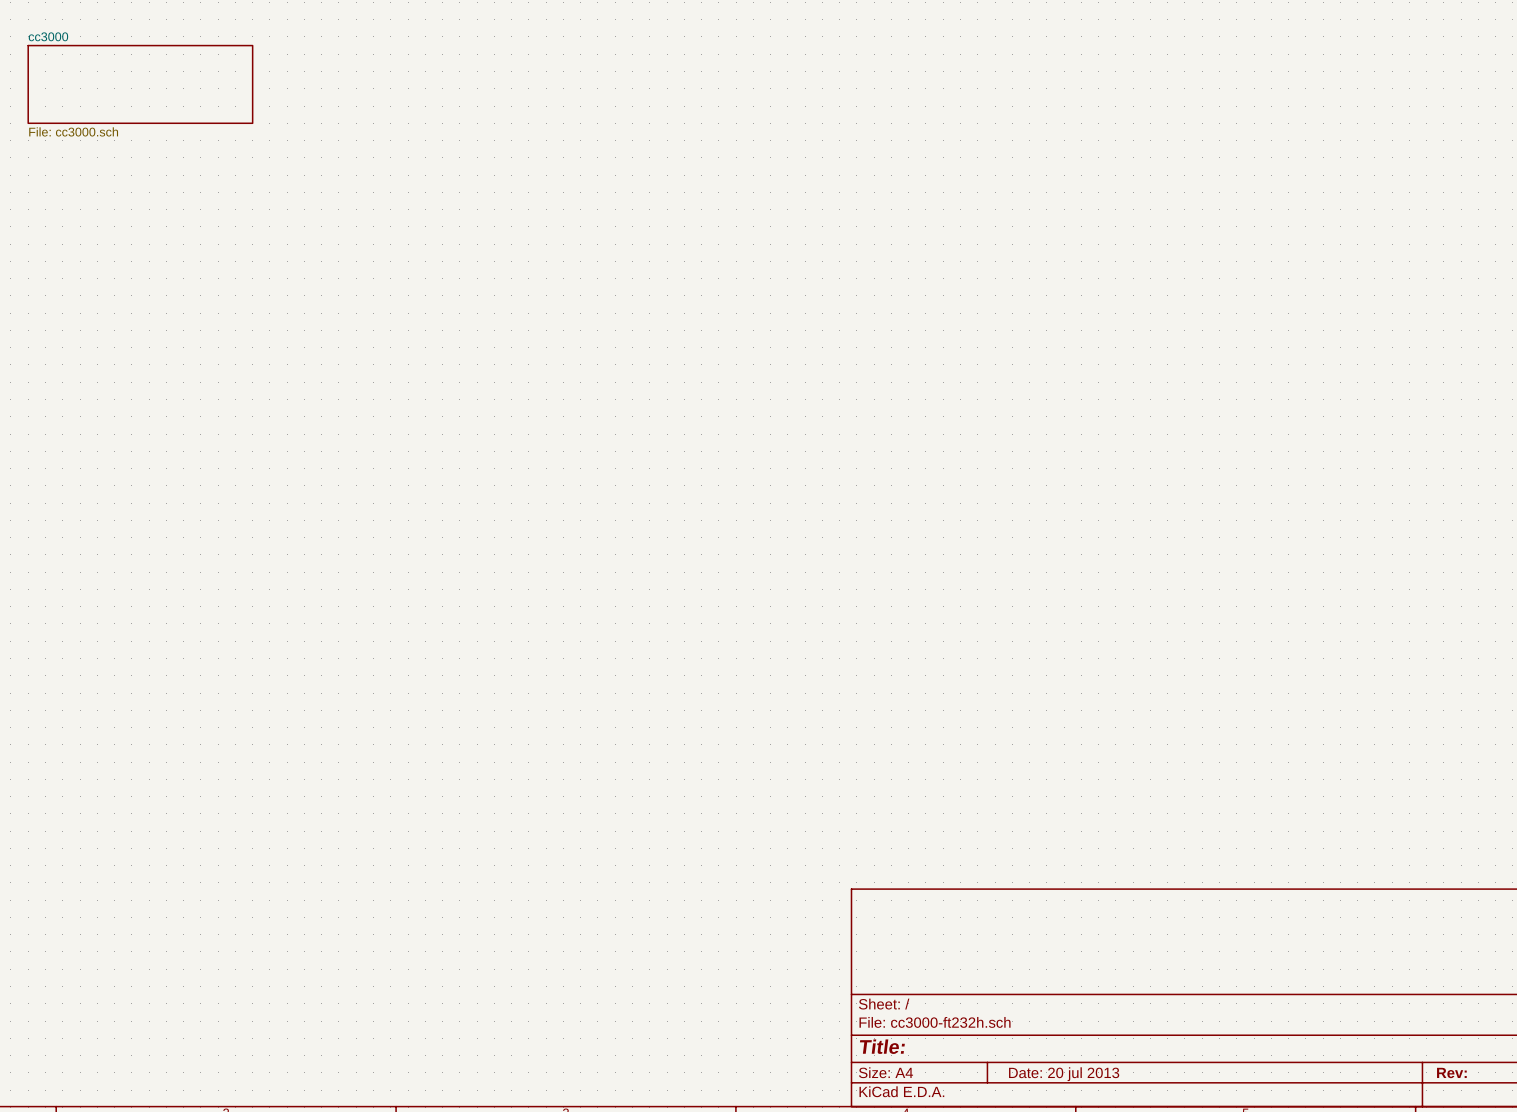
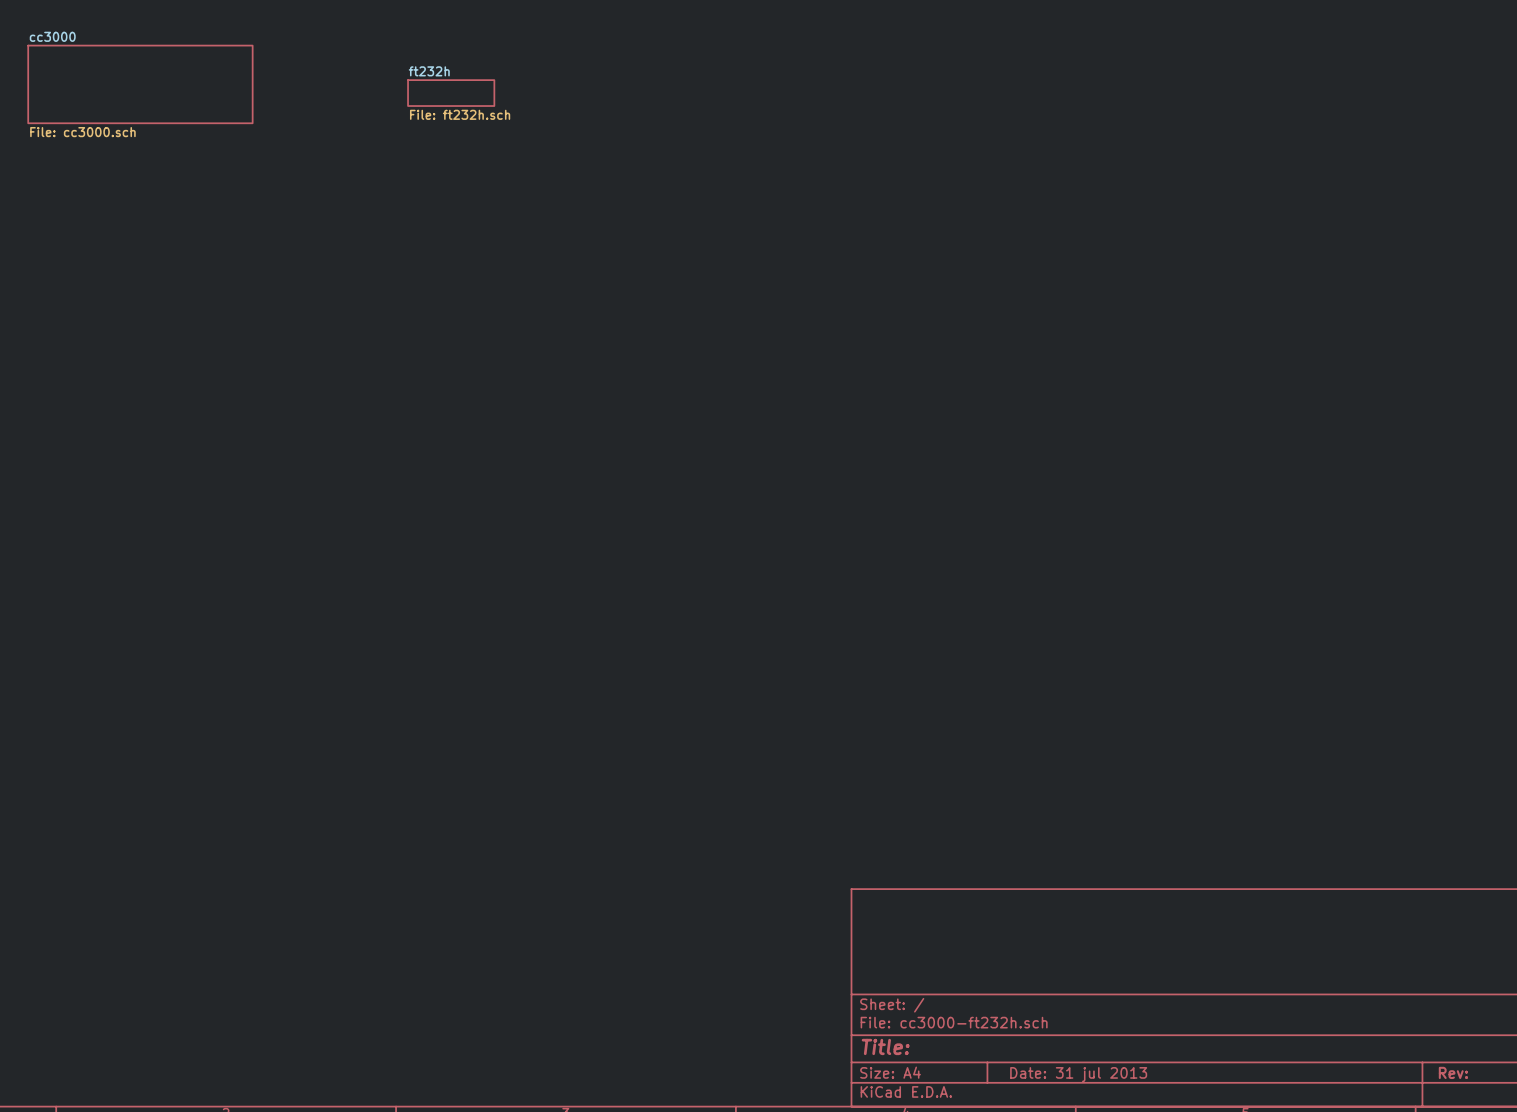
sheet ft232h: none -> File: ft232h.sch (451, 93)
title block: Date: 20 jul 2013 (1064, 1074) -> Date: 31 jul 2013 (1078, 1074)

